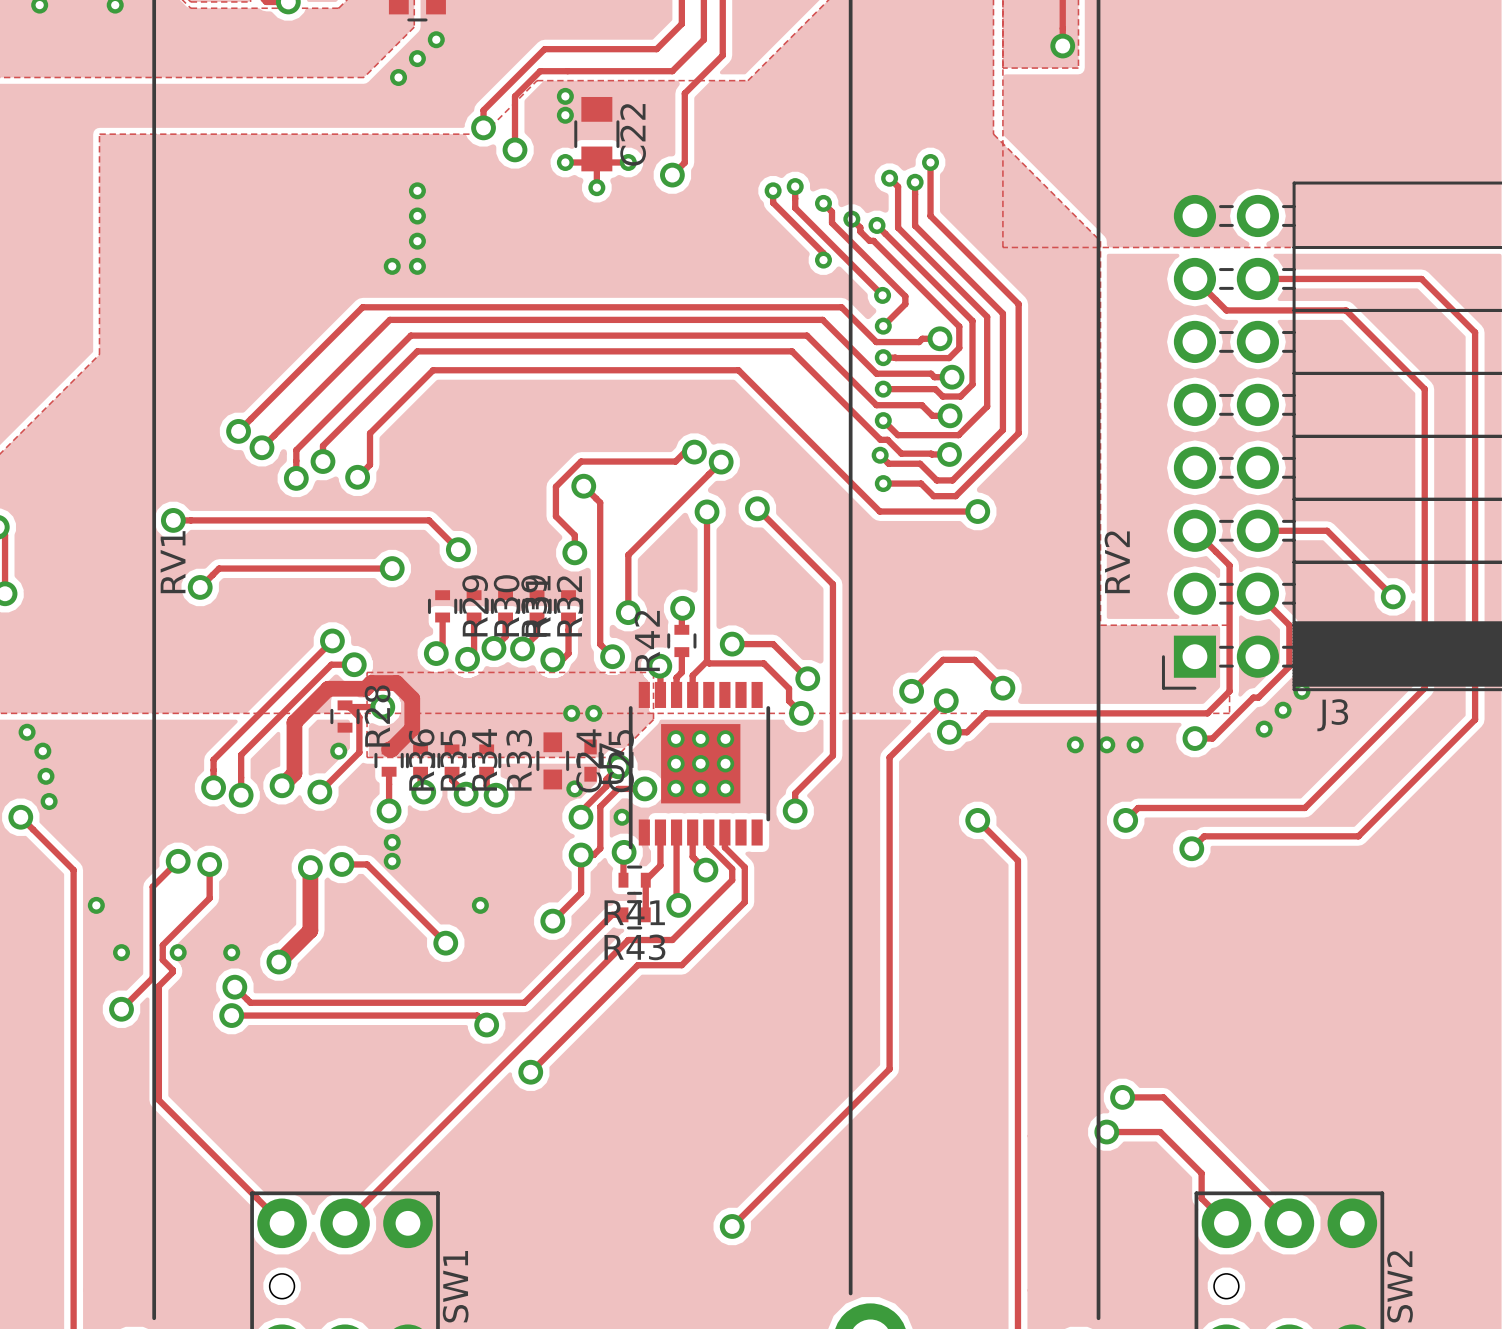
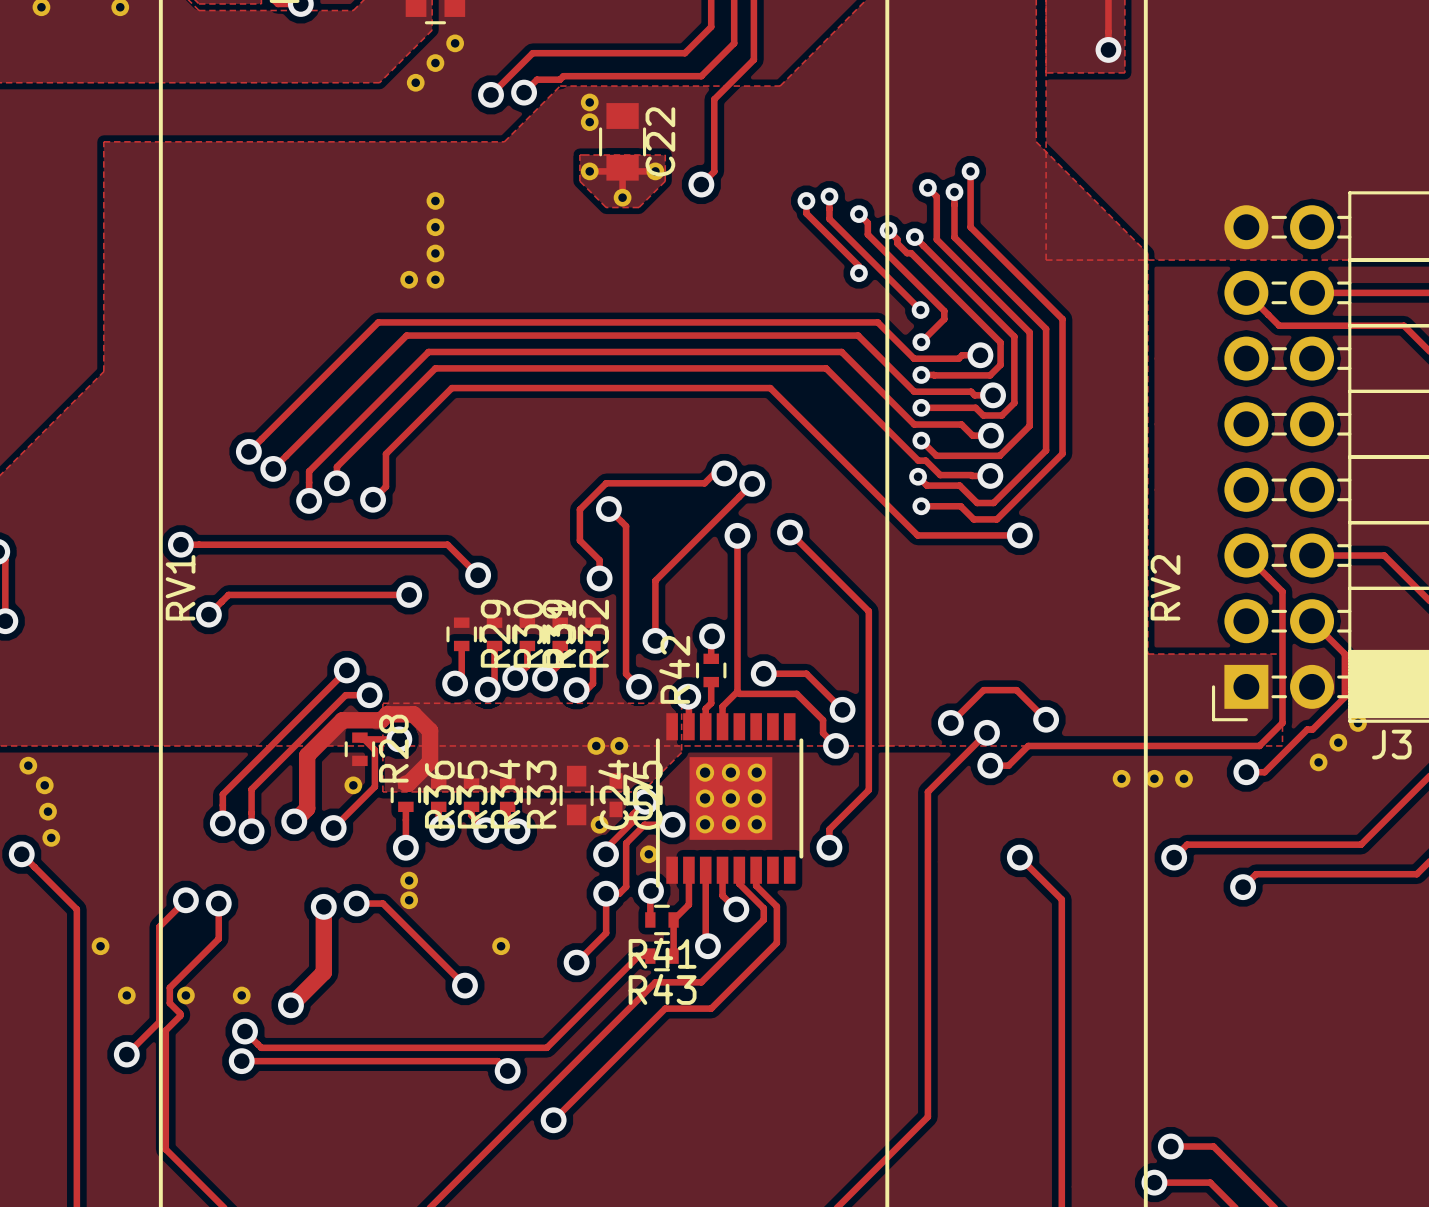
track: (544, 49) (483, 110) (483, 127) -> (568, 53) (532, 53) (491, 94)
track: (536, 74) (515, 96) (515, 149) -> (559, 79) (537, 79) (524, 92)
via: none -> (524, 92)
via: none -> (491, 94)
via: (483, 127) -> none
zone outline: none -> (579, 154) (665, 154) (665, 181) (638, 207) (606, 207) (579, 181) (579, 154)
via: (515, 149) -> none

